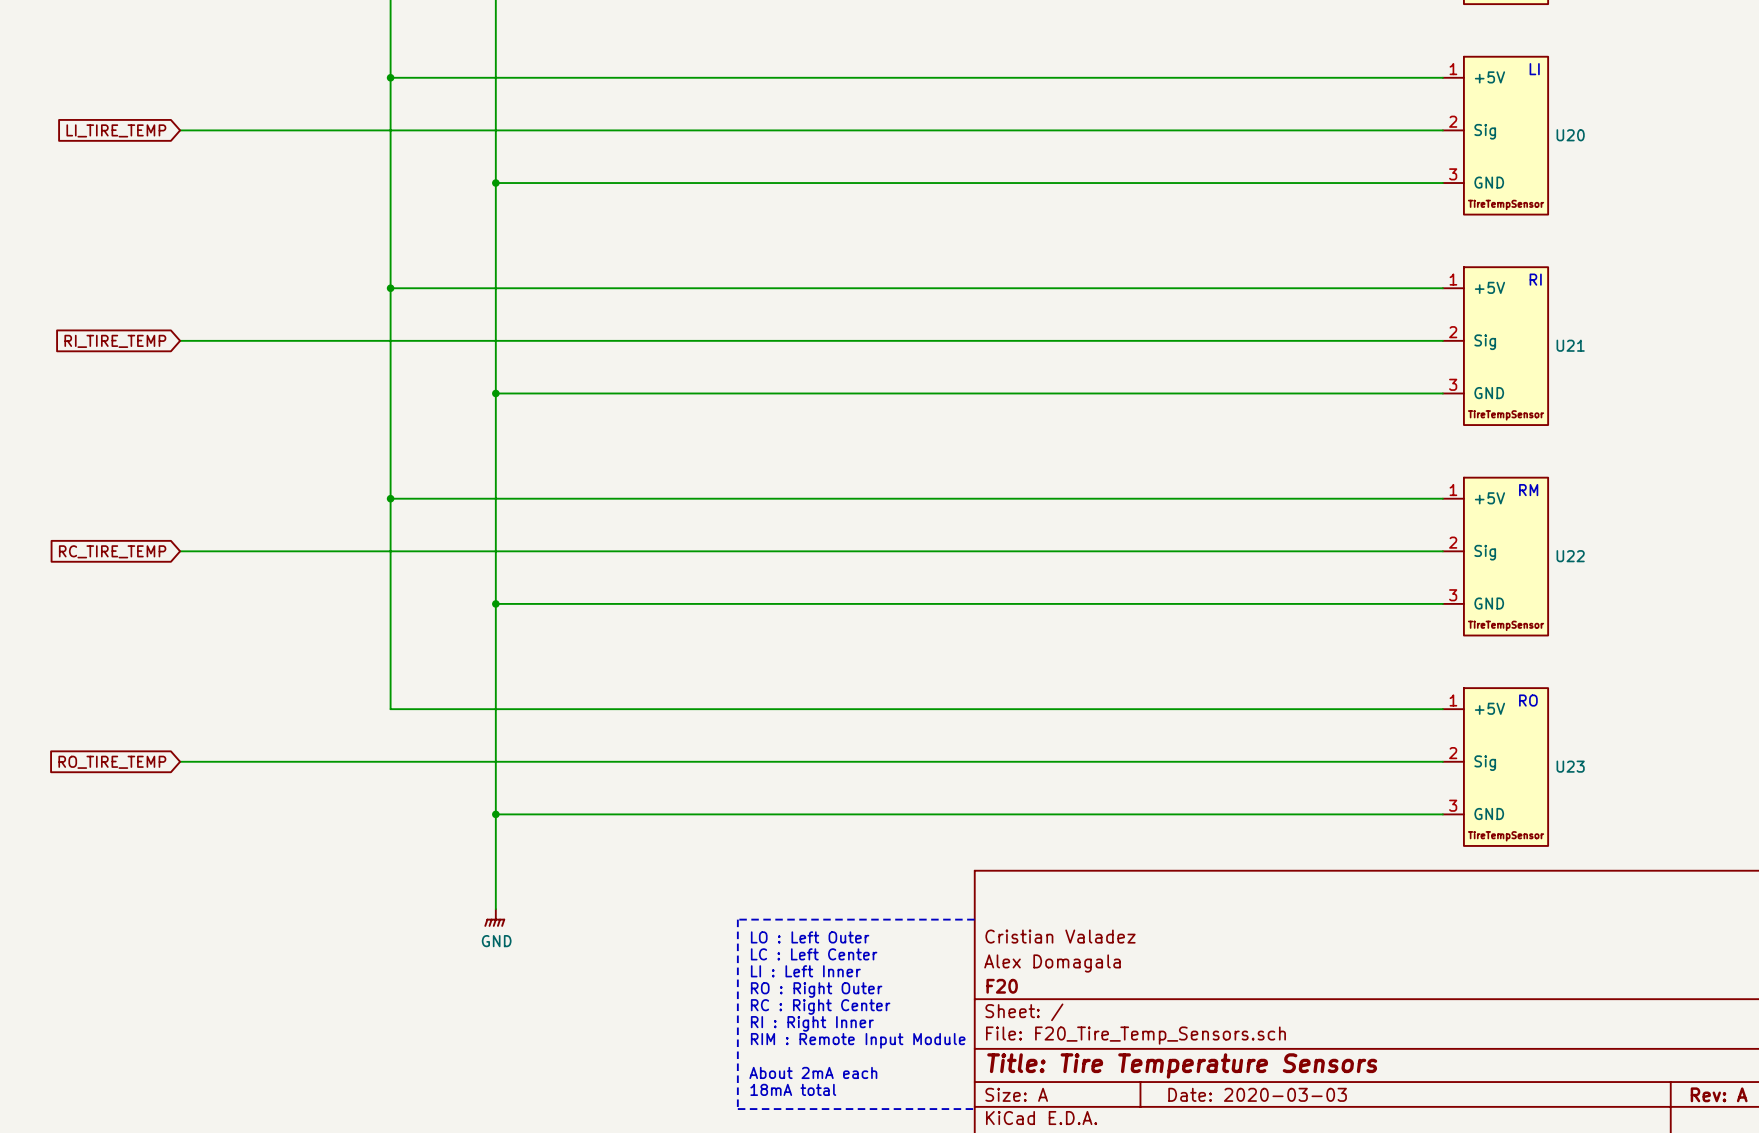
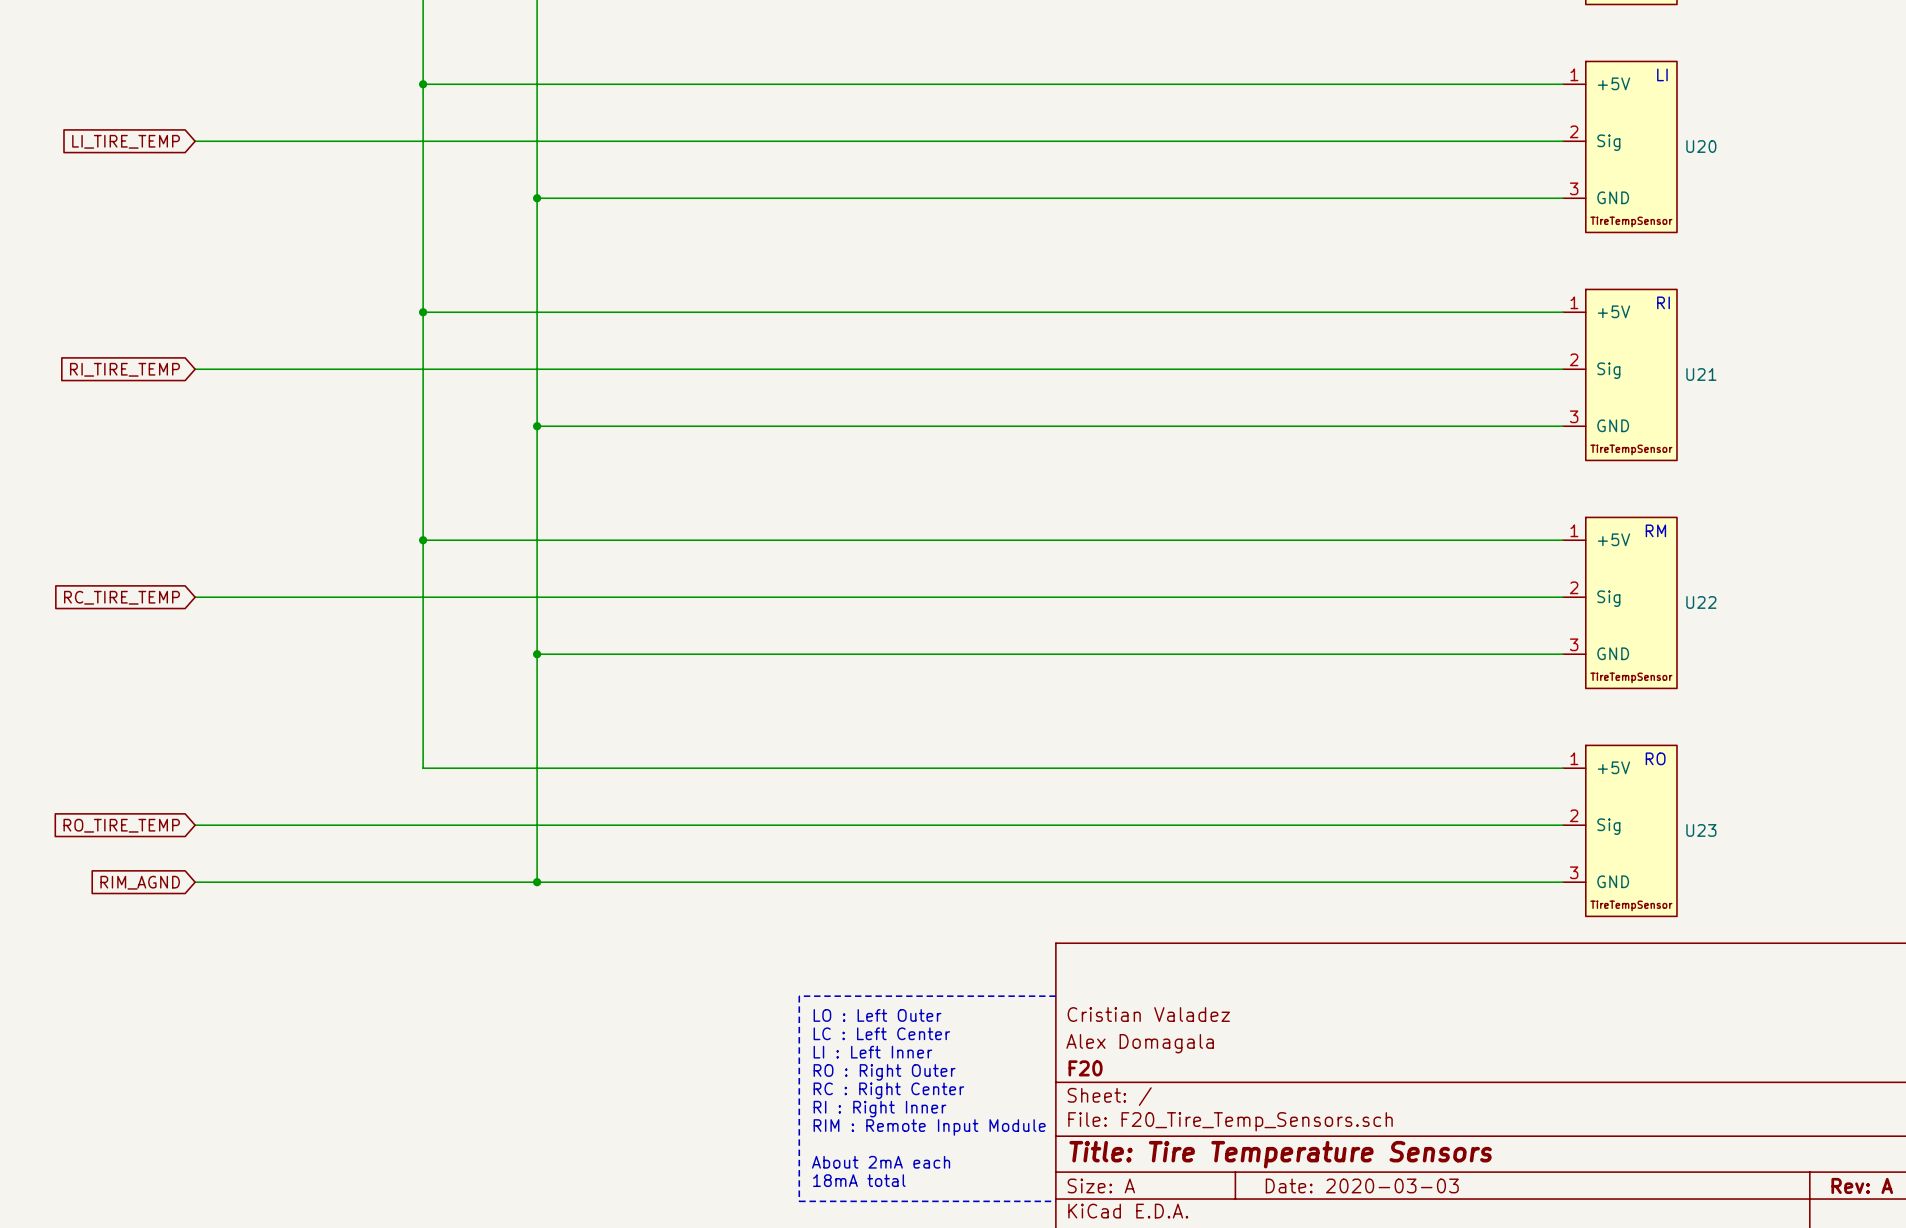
global label: none -> RIM_AGND (140, 882)
wire: (495, 814) (495, 909) -> (537, 882) (195, 882)
power symbol: GND (494, 917) -> none

